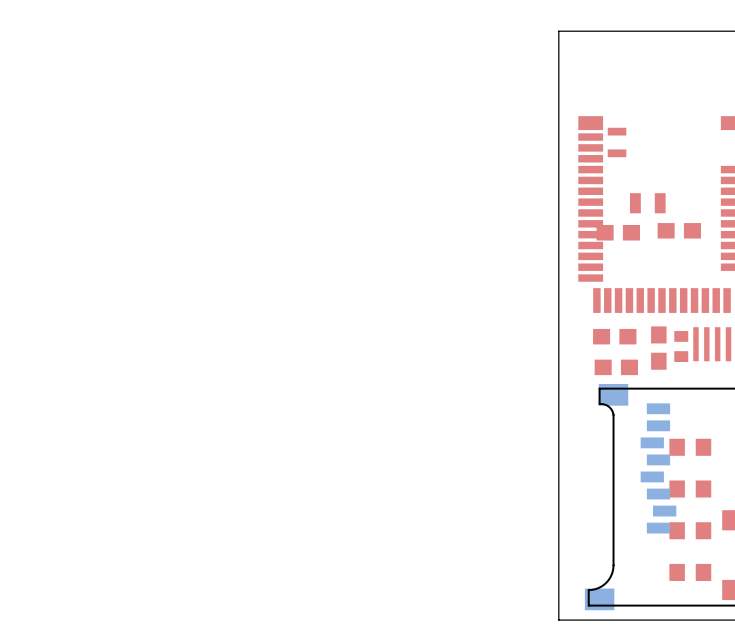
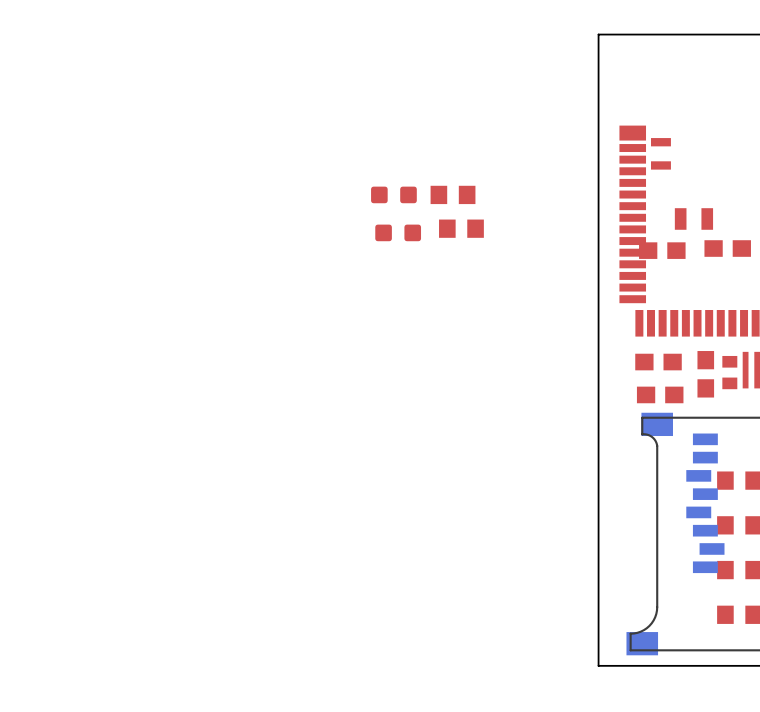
part: none -> (393, 194)
part: none -> (453, 194)
part: none -> (461, 228)
part: none -> (398, 232)

